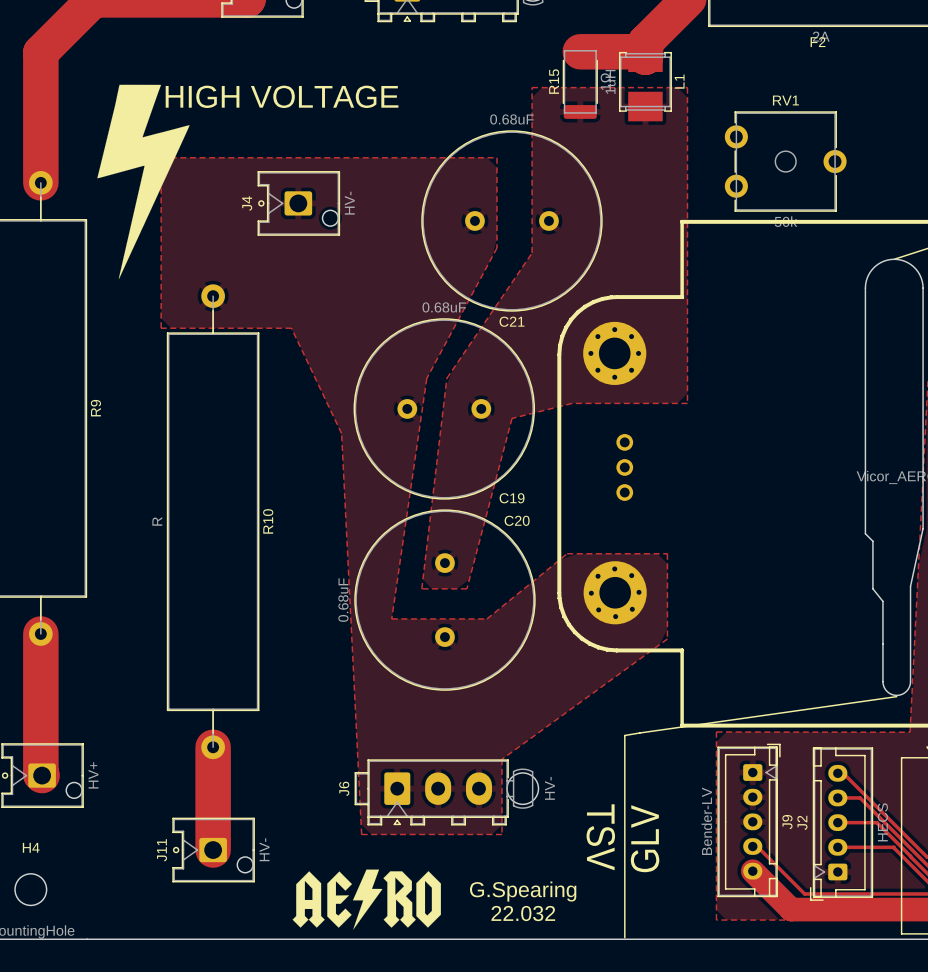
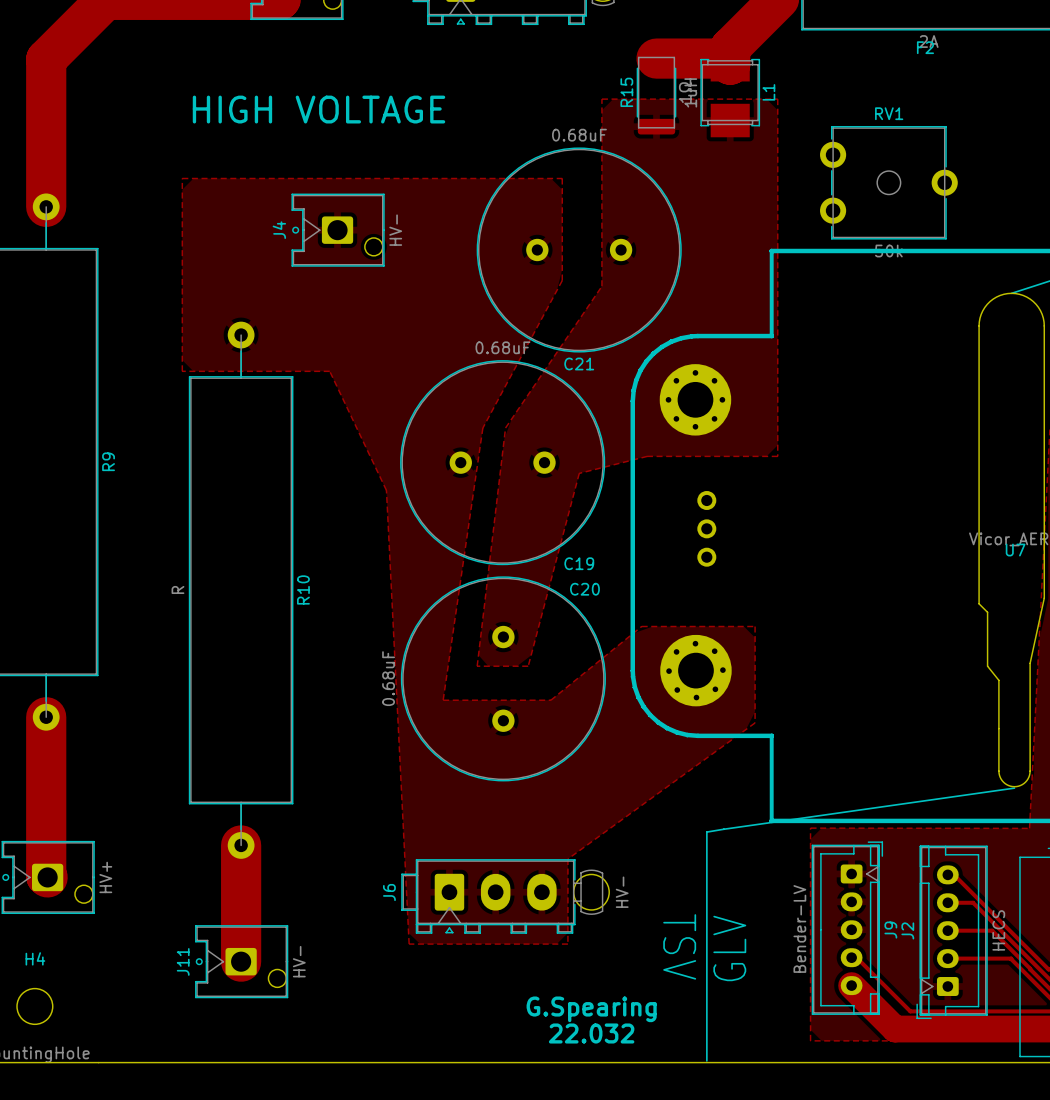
drawing: [97, 84, 190, 279] -> none
U7 name: none -> U7 (1015, 550)
drawing: [292, 869, 441, 930] -> none

